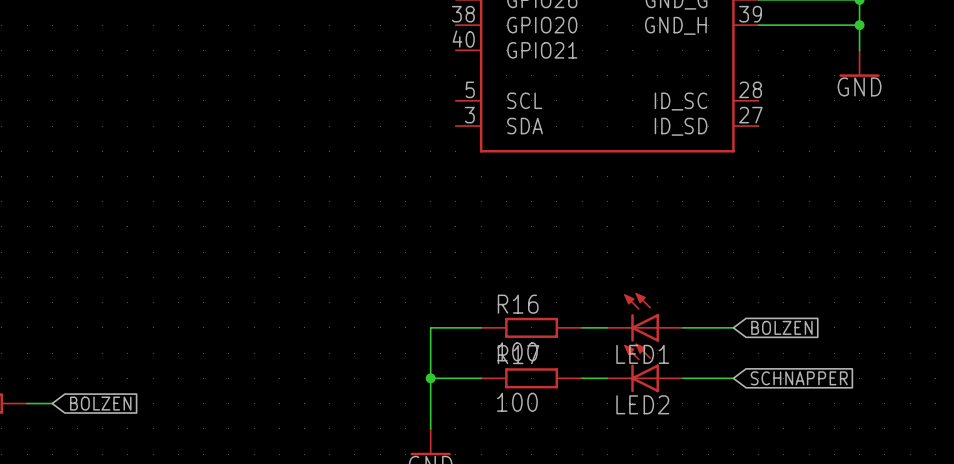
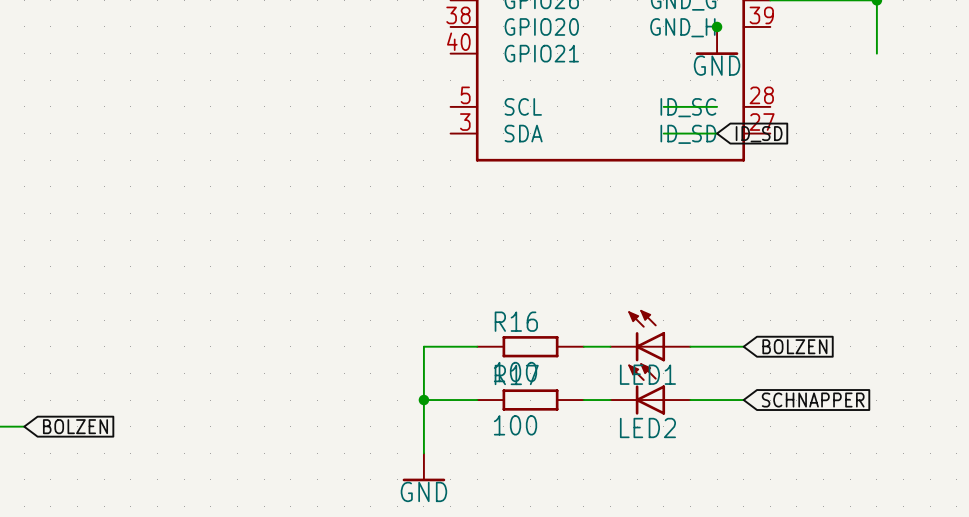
junction: none -> (717, 26)
wire: (758, 25) (859, 25) -> none
junction: (859, 25) -> none
power symbol position: GND (859, 63) -> GND (717, 40)
wire: none -> (663, 106) (717, 106)
wire: none -> (663, 133) (717, 133)
global label: none -> ID_SD (759, 134)

